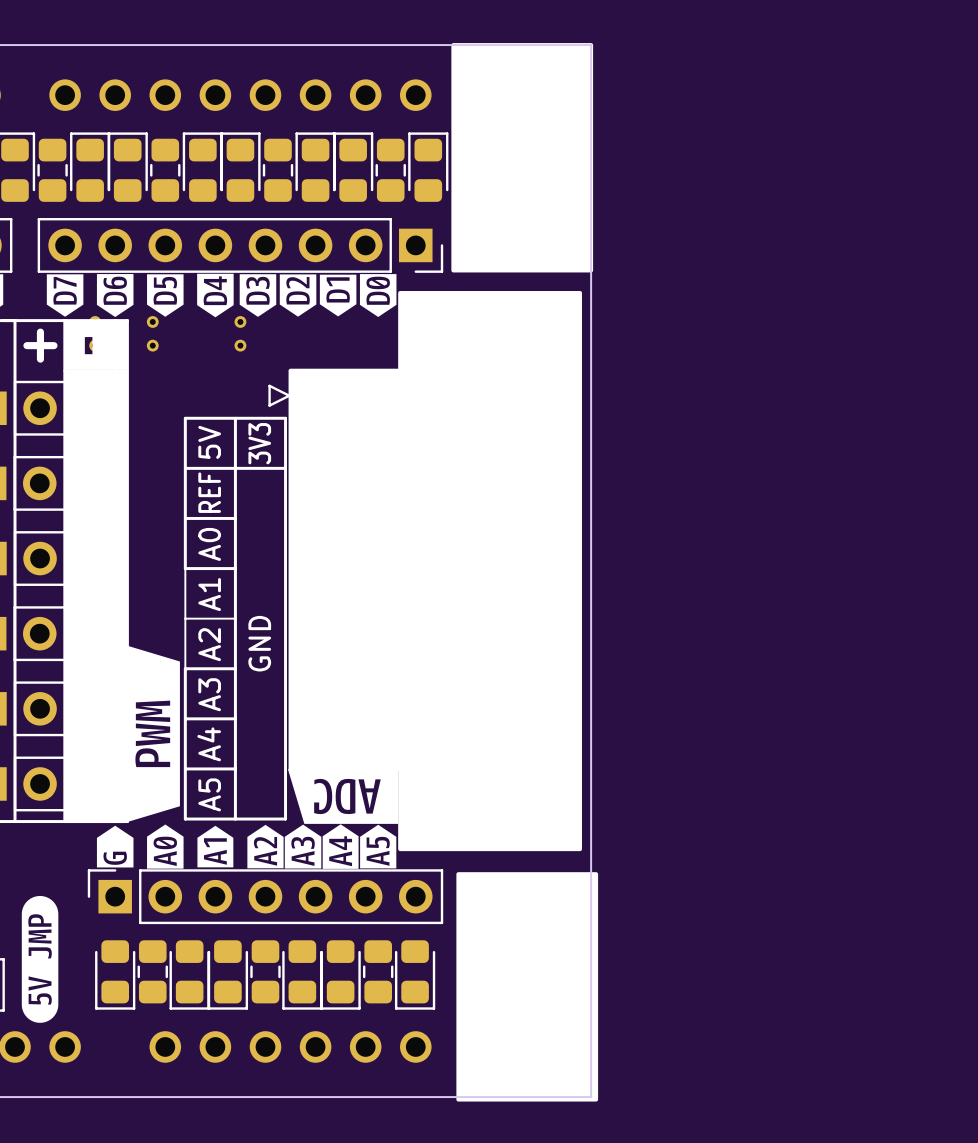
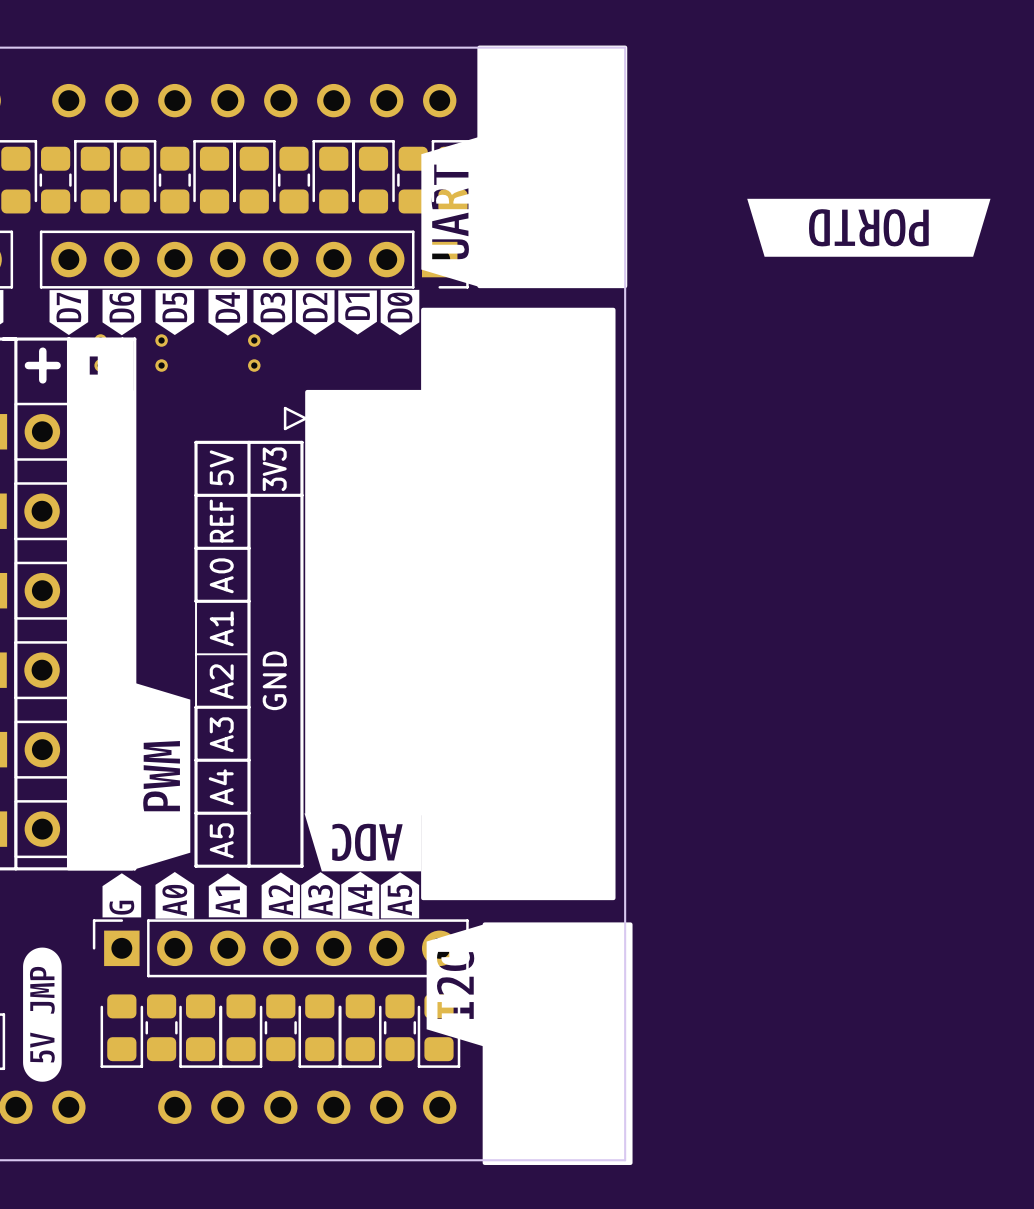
drawing: none -> [421, 136, 480, 287]
drawing: none -> [747, 198, 991, 257]
drawing: none -> [426, 924, 485, 1047]

